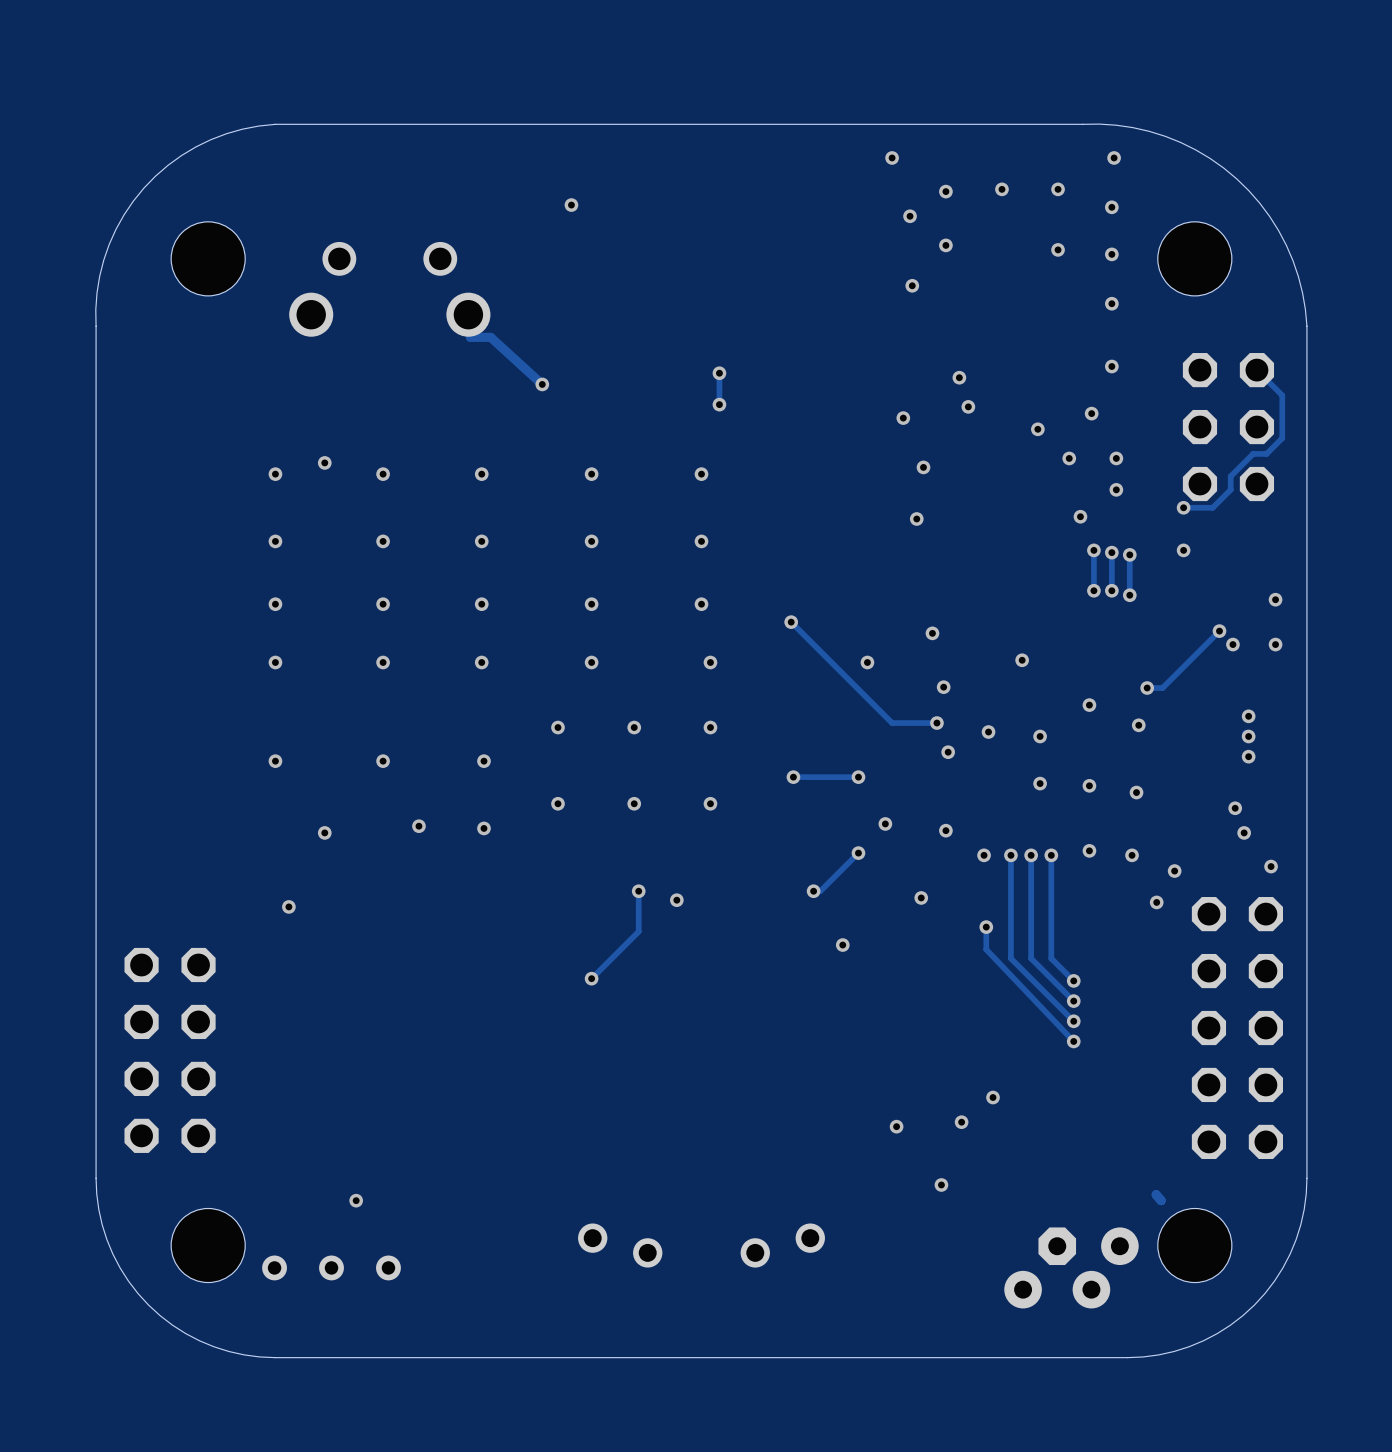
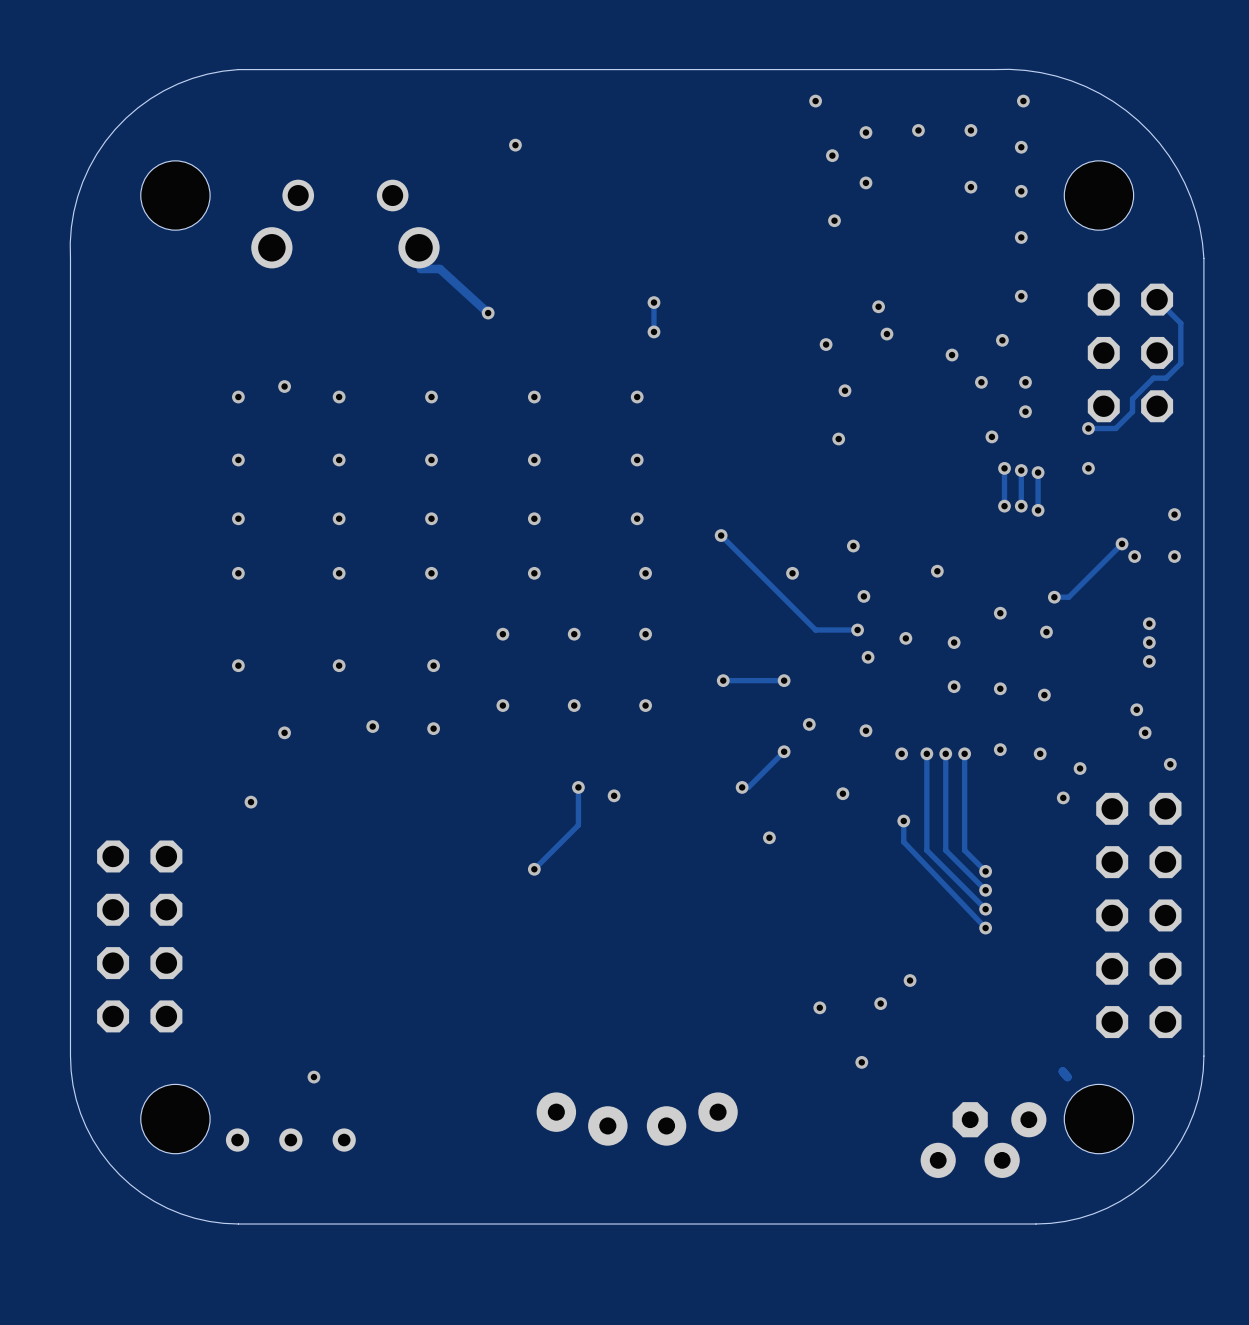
part footprint: [578, 1223, 663, 1268] -> [536, 1092, 628, 1146]
part footprint: [740, 1223, 825, 1268] -> [646, 1092, 738, 1146]

